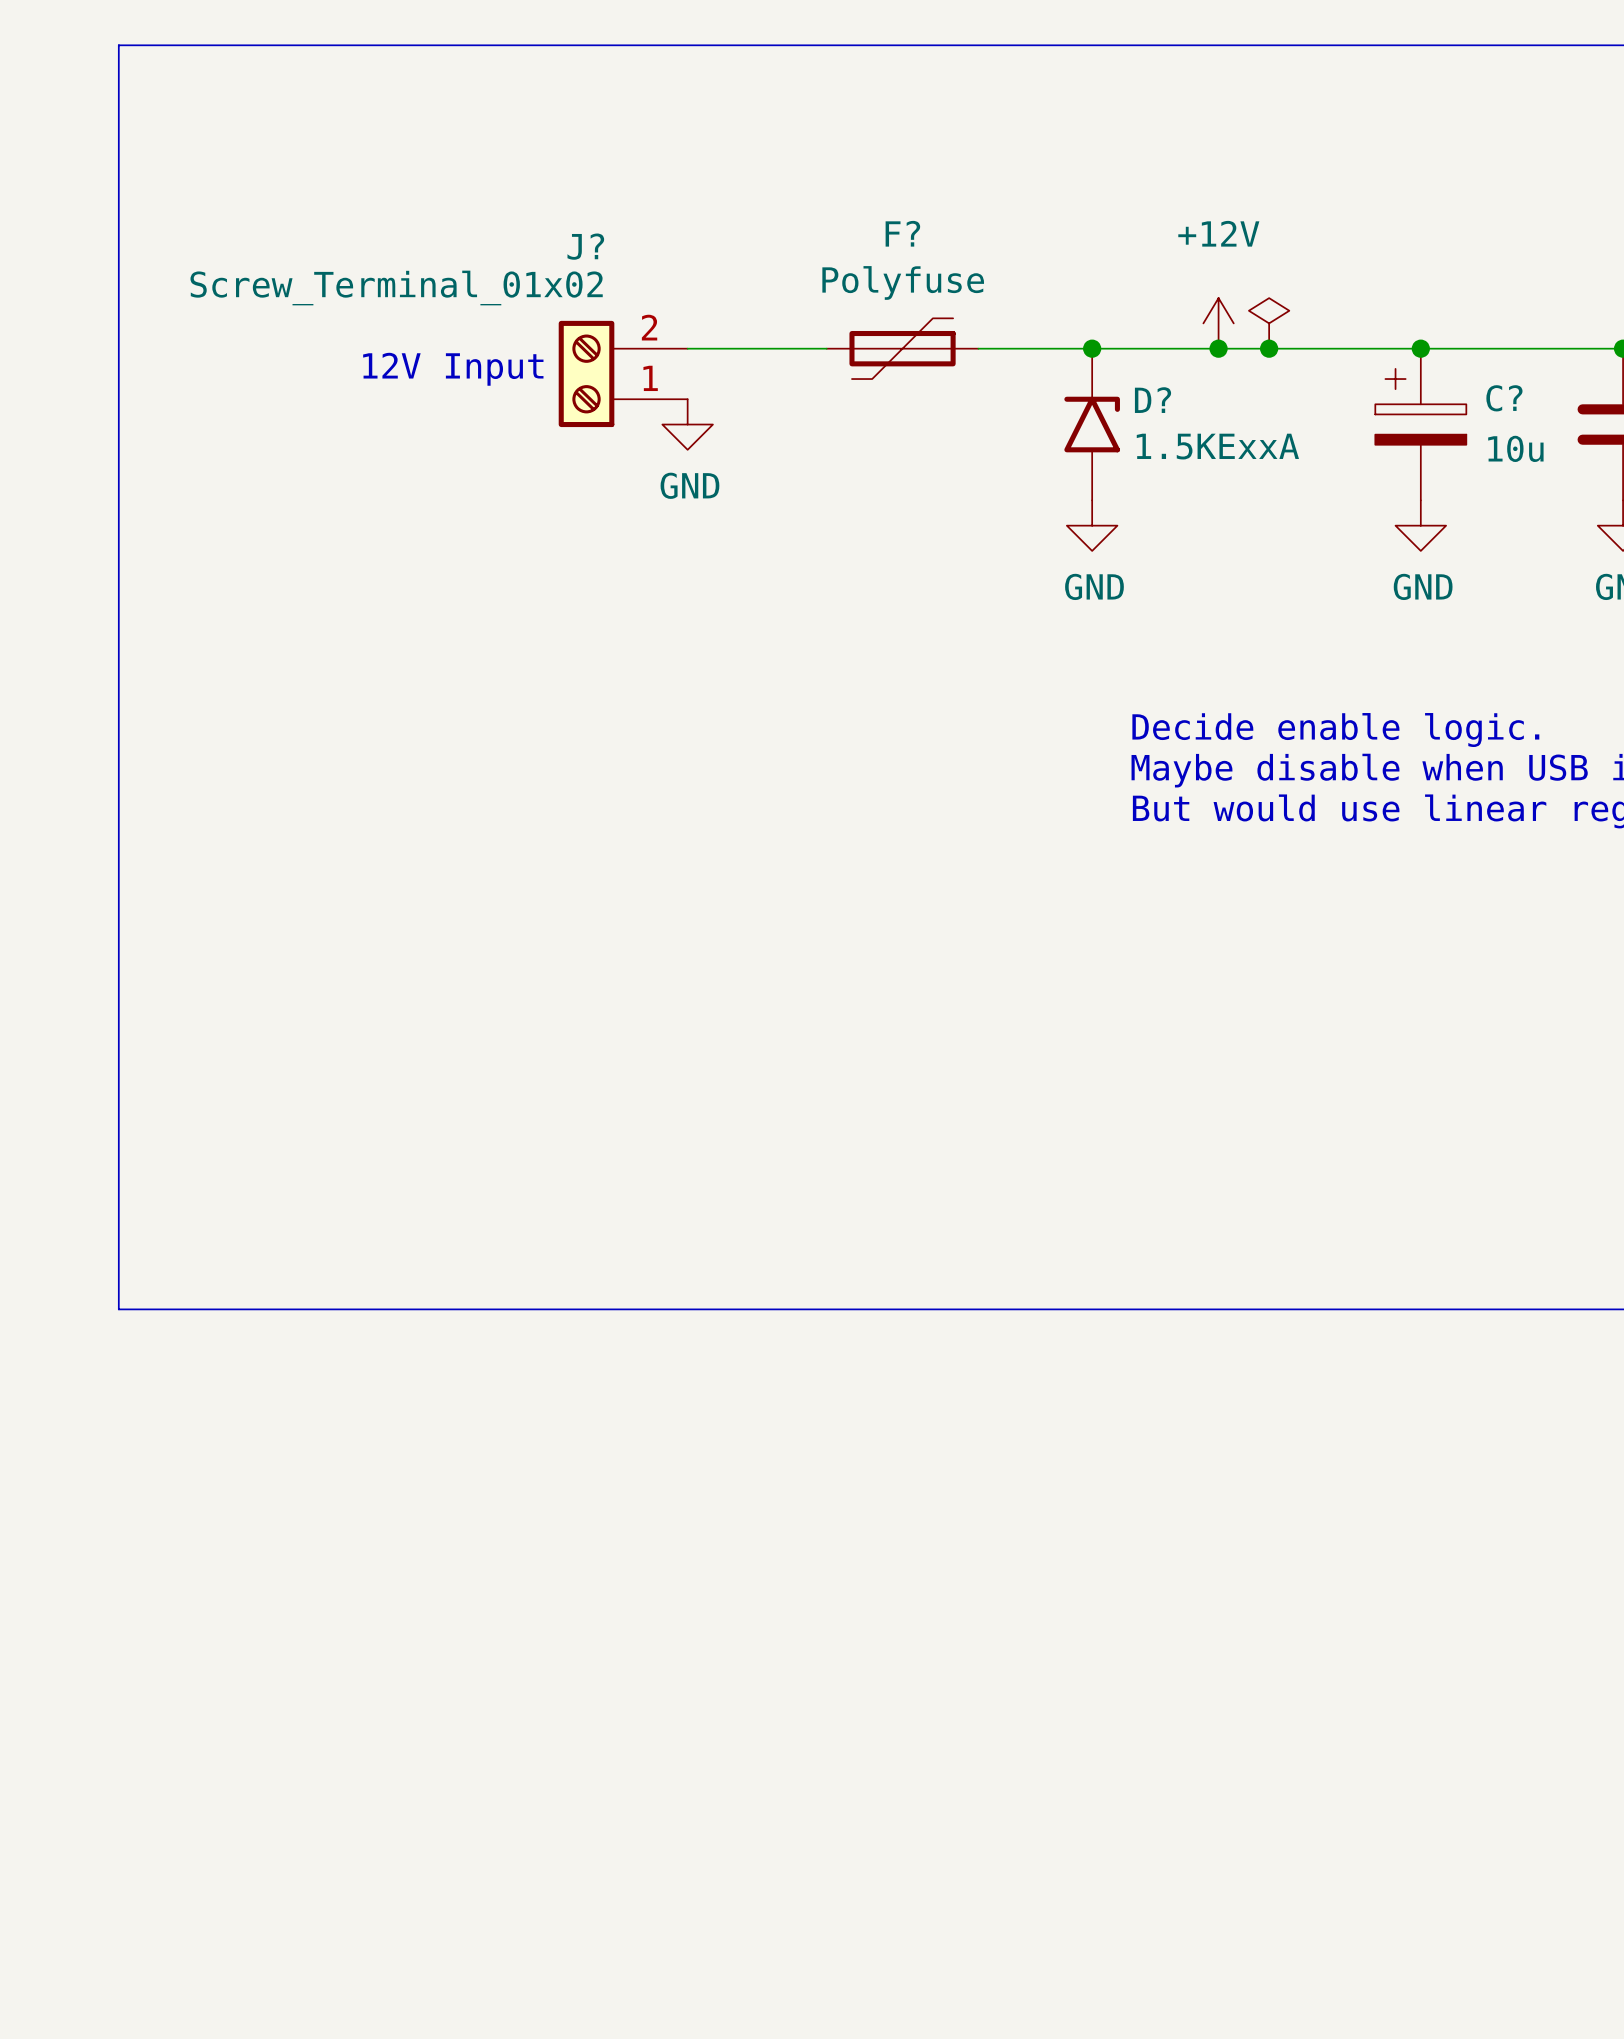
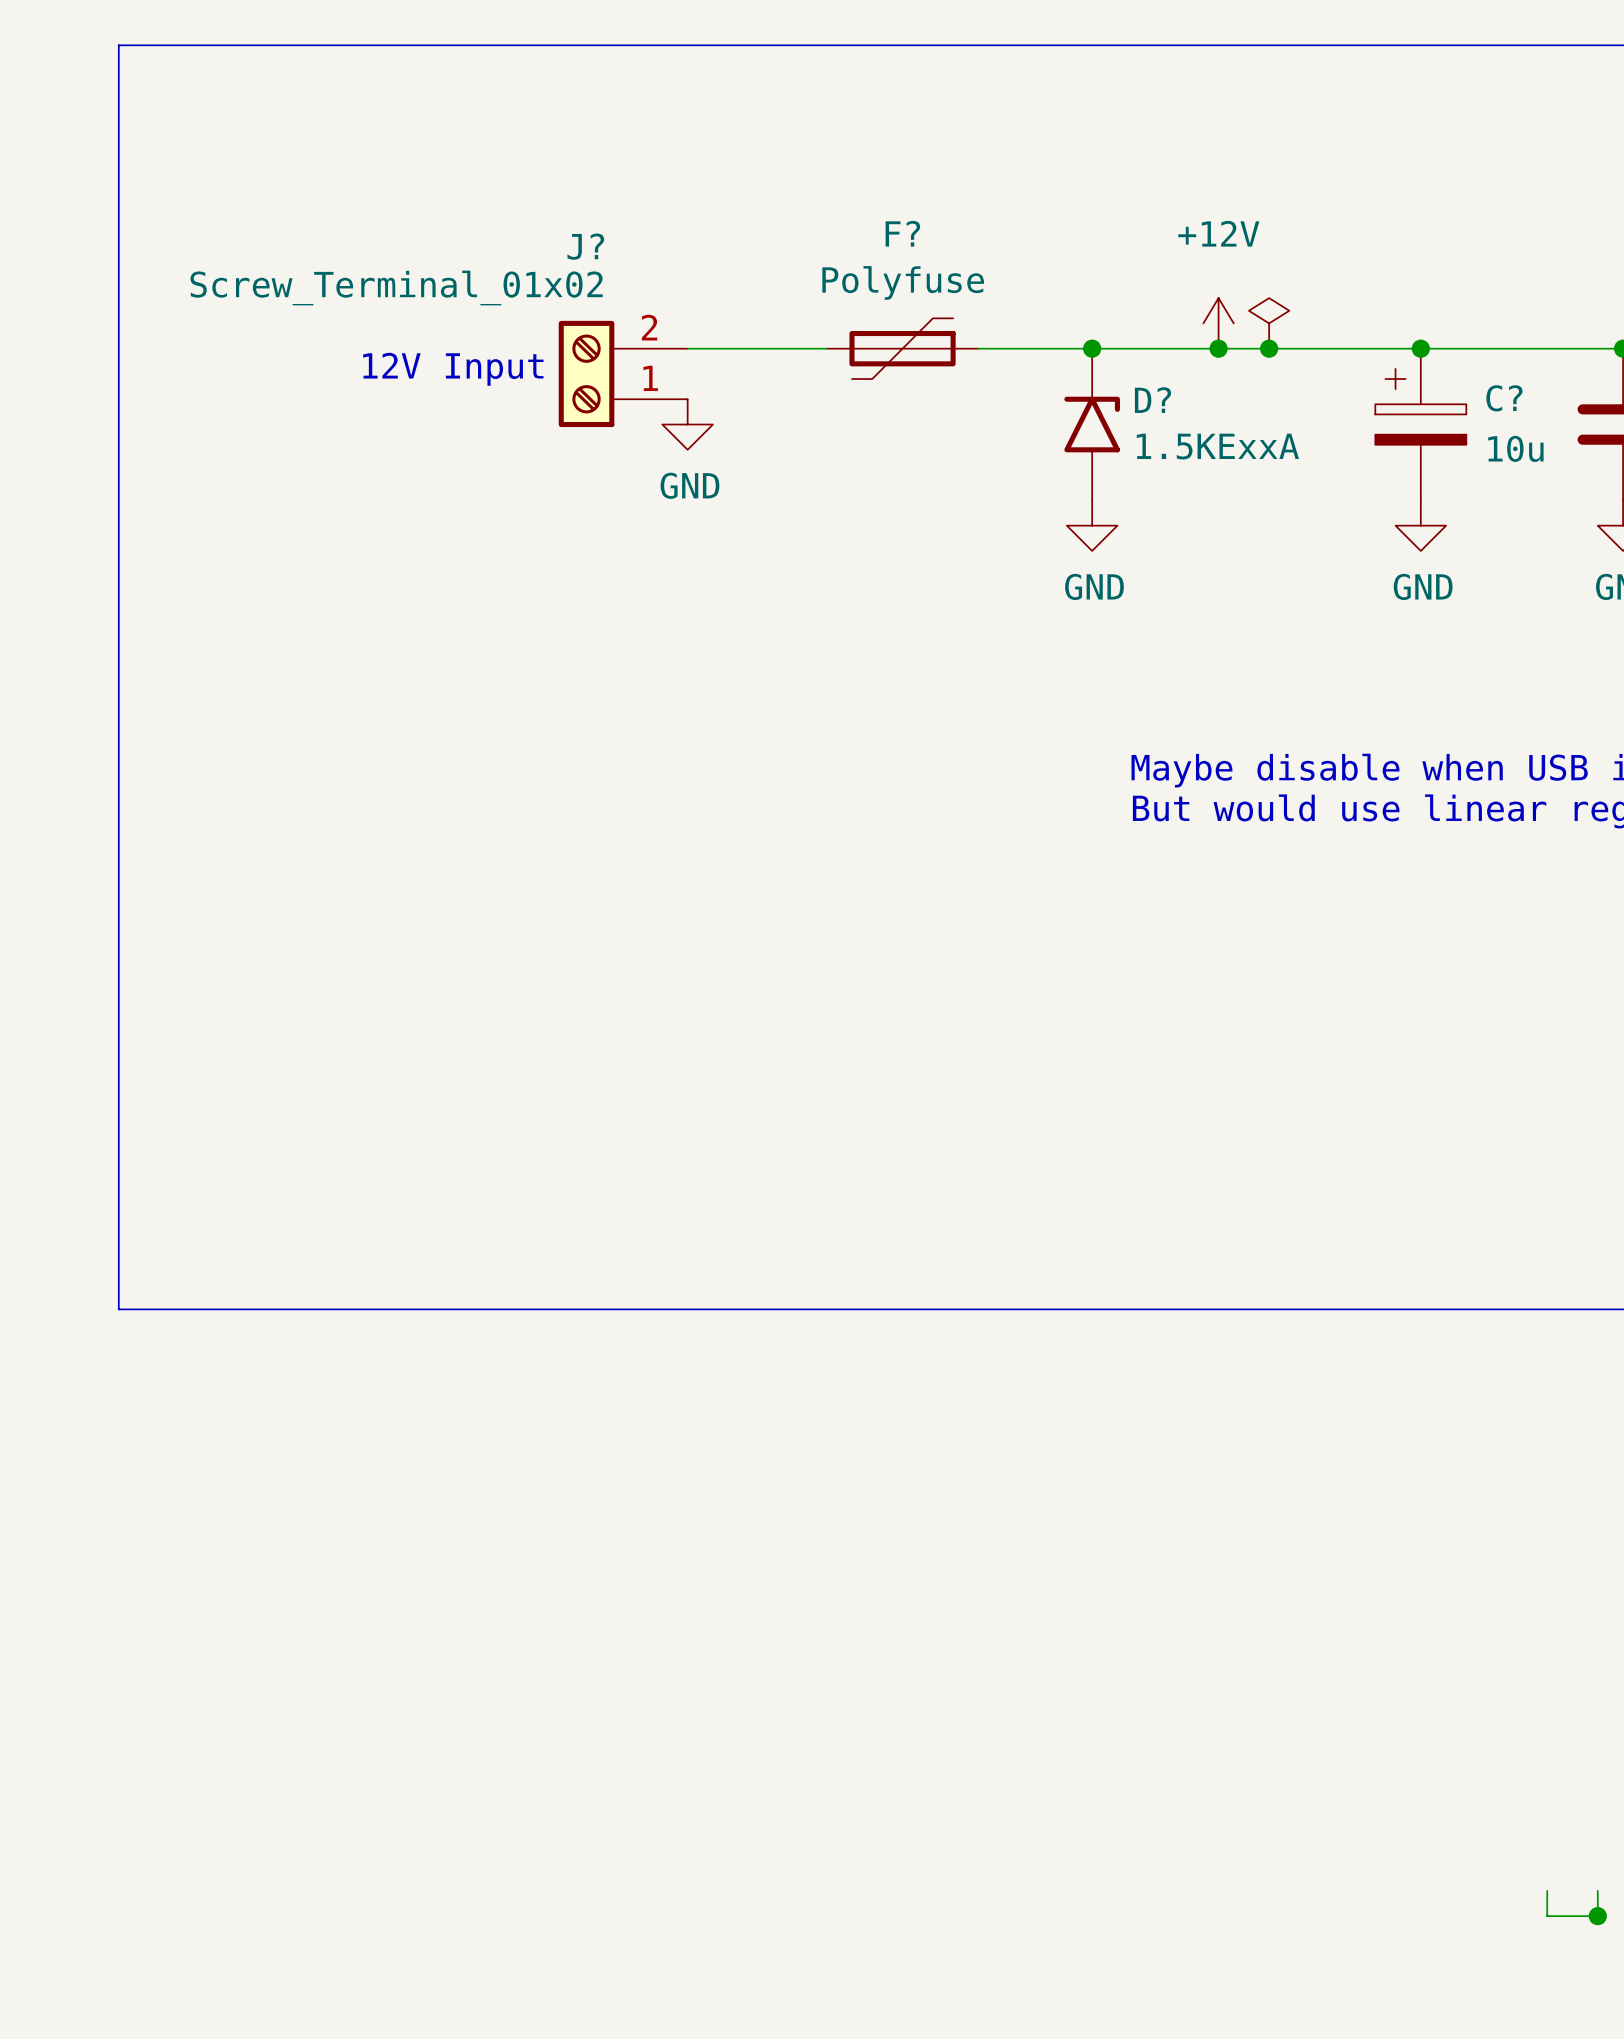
text: Decide enable logic. (1335, 730) -> none
wire: none -> (1547, 1890) (1547, 1916) (1597, 1916) (1597, 1890)
junction: none -> (1597, 1916)

